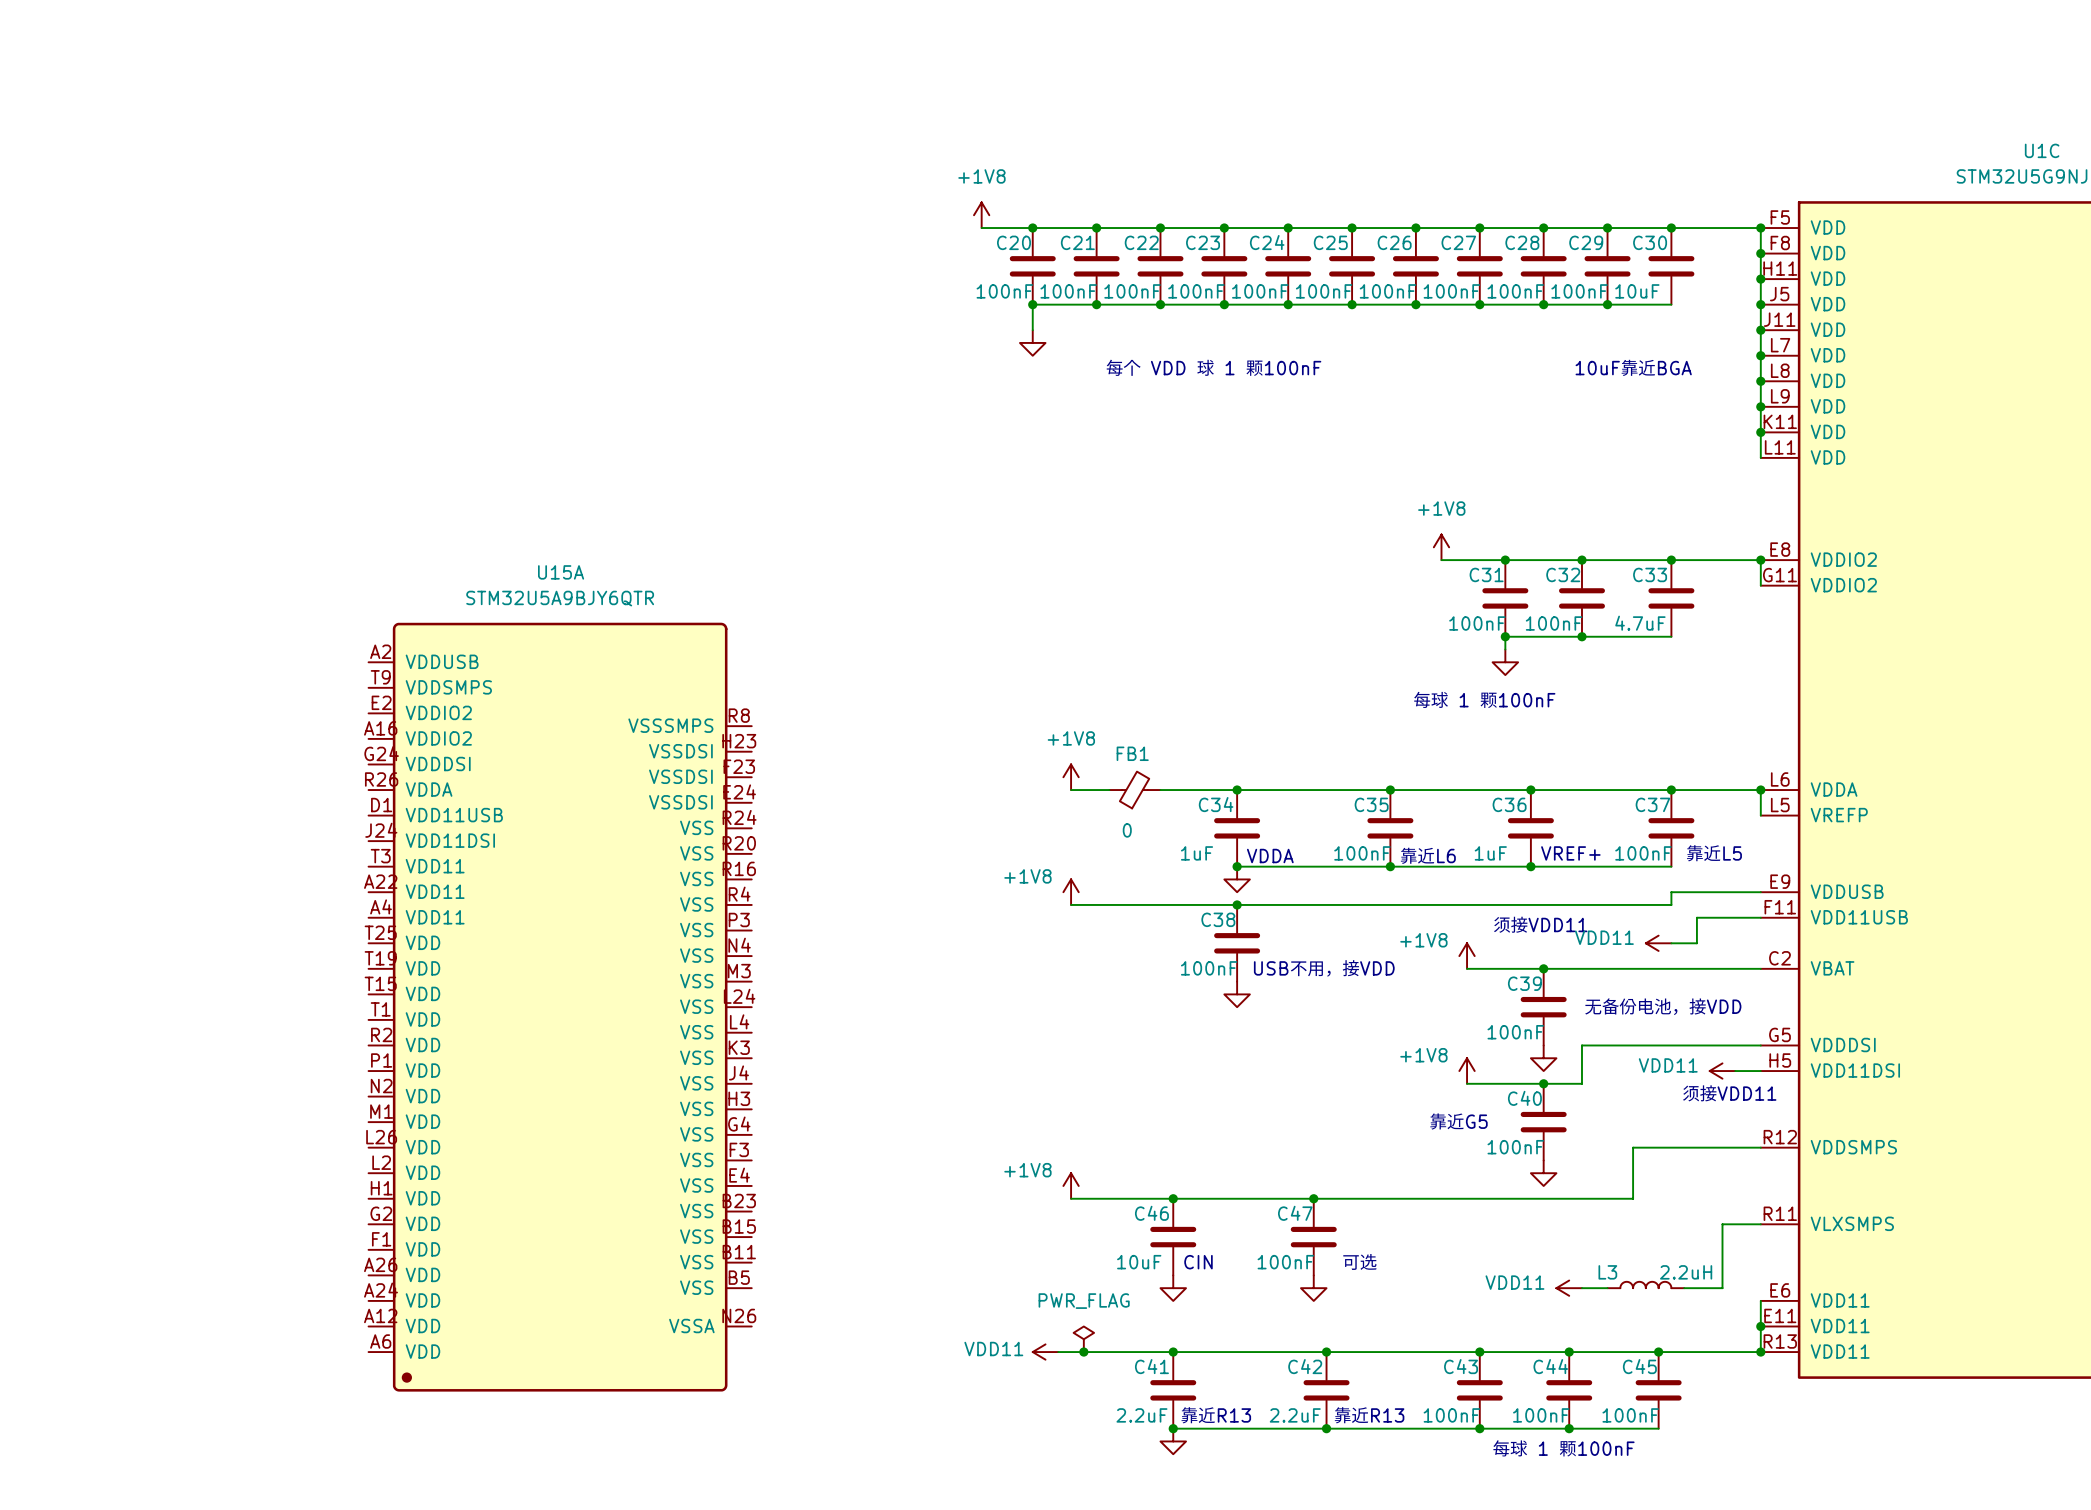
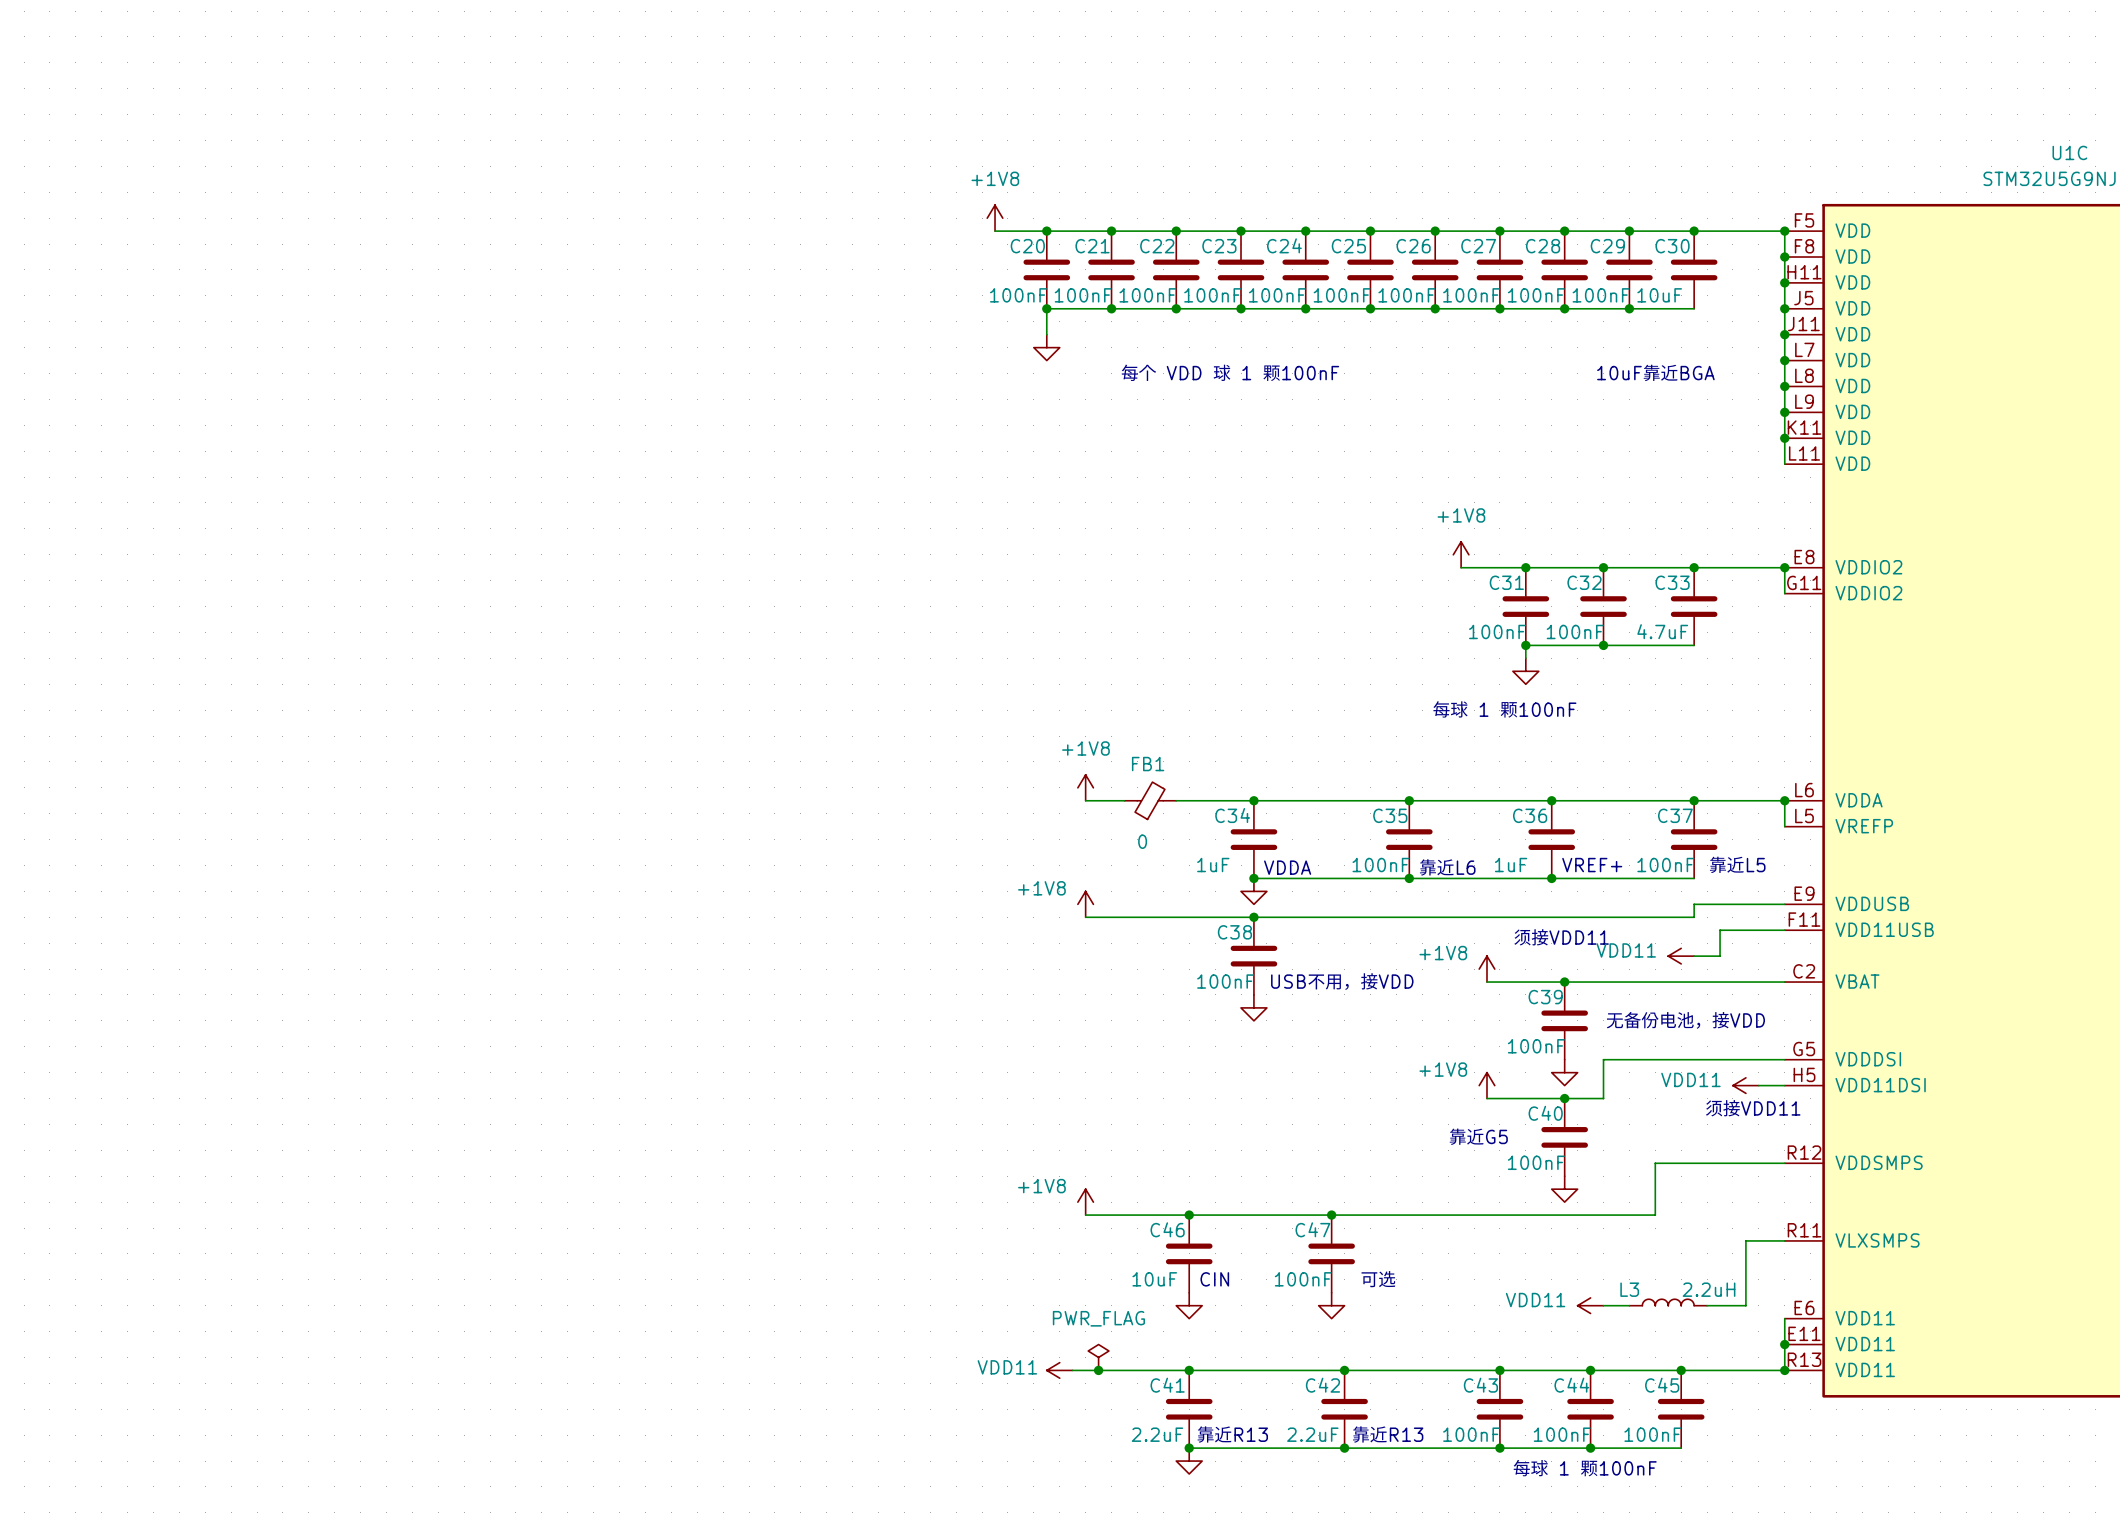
U15A: STM32U5A9BJY6QTR (560, 1007) -> none

